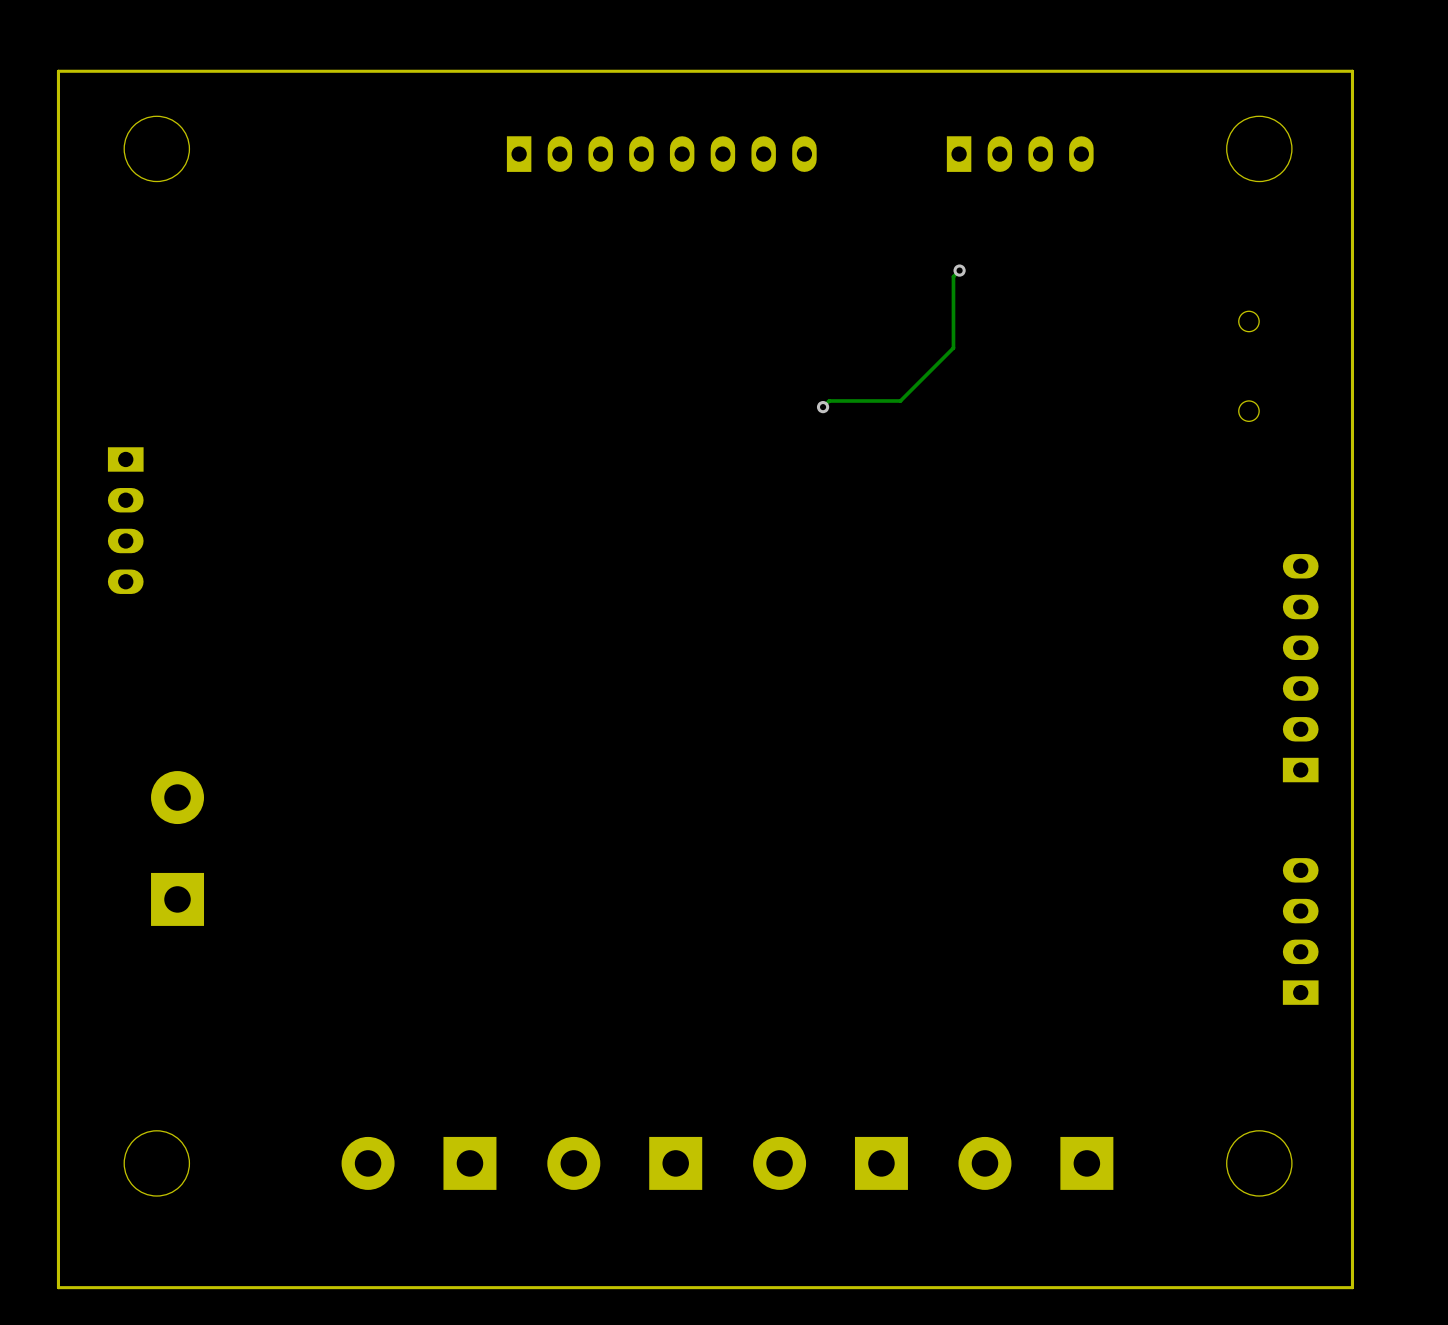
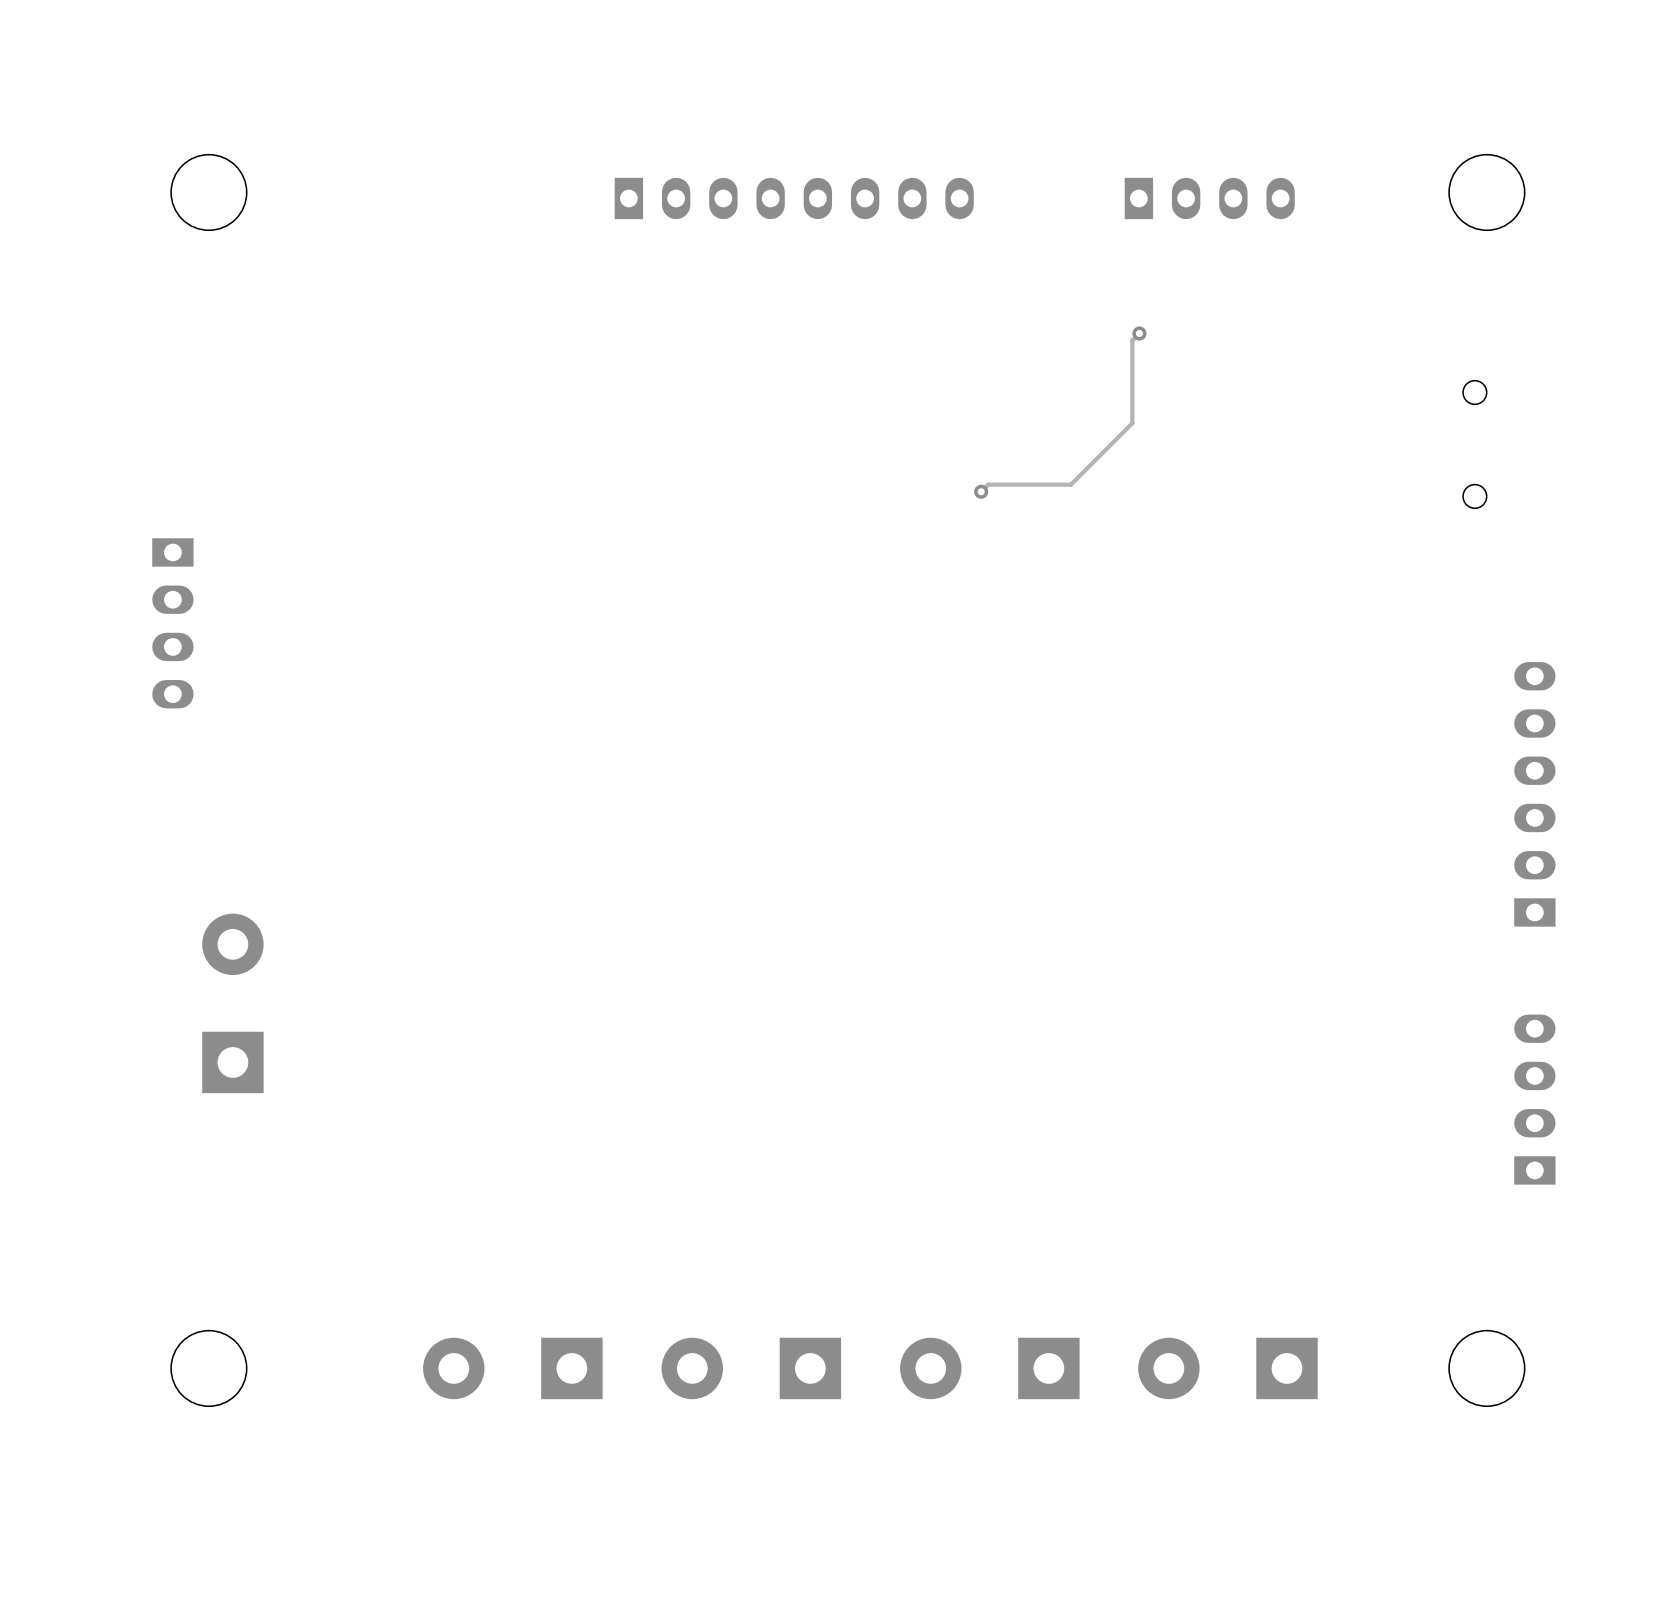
board edge: (1352, 71) (58, 71) (58, 1287) (1352, 1287) (1352, 71) -> none

